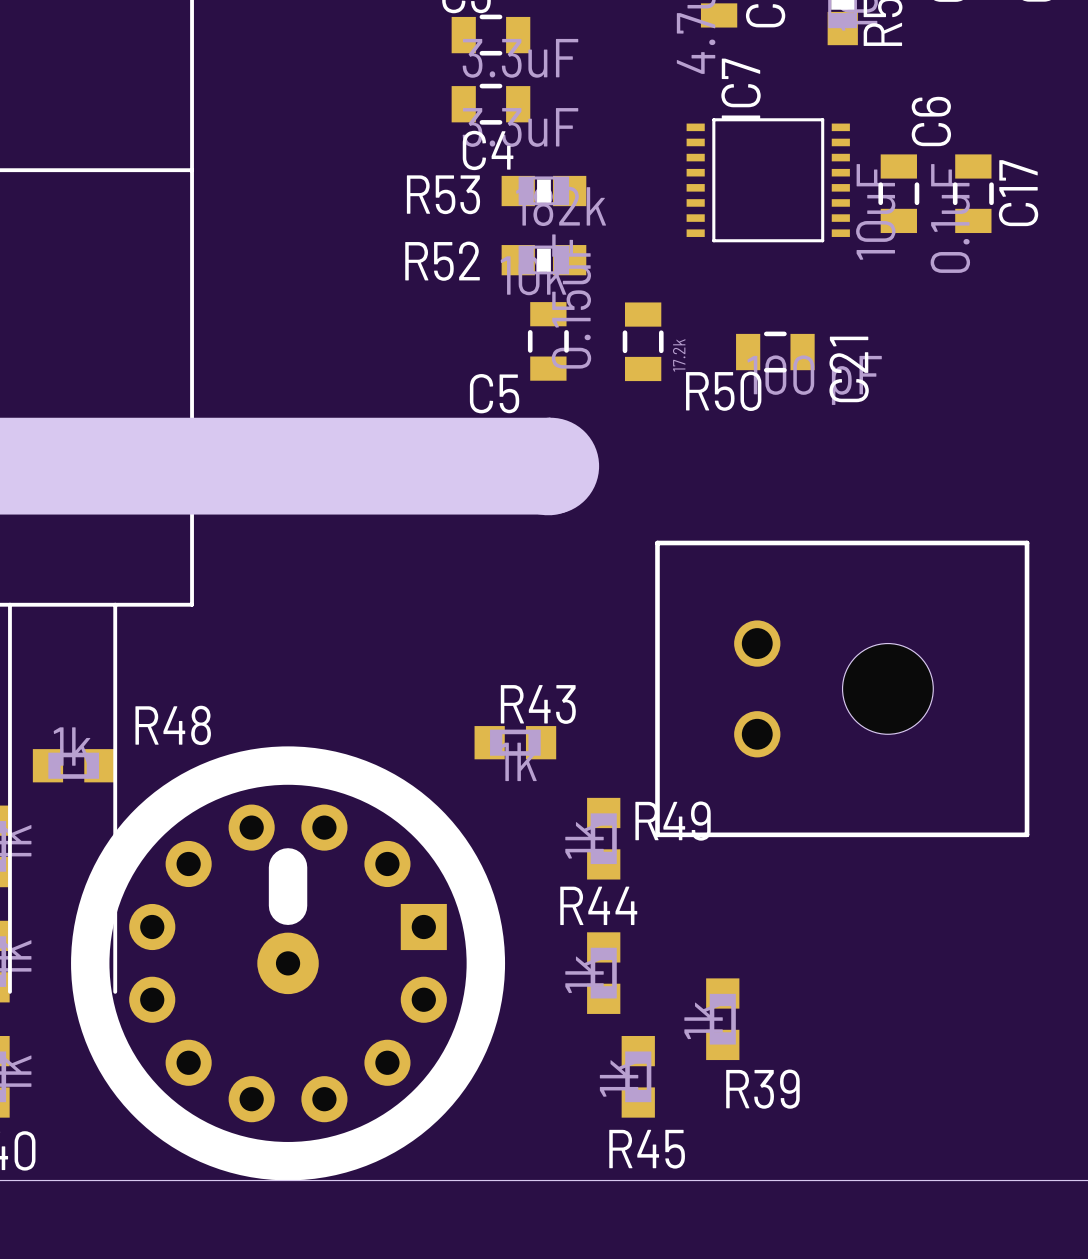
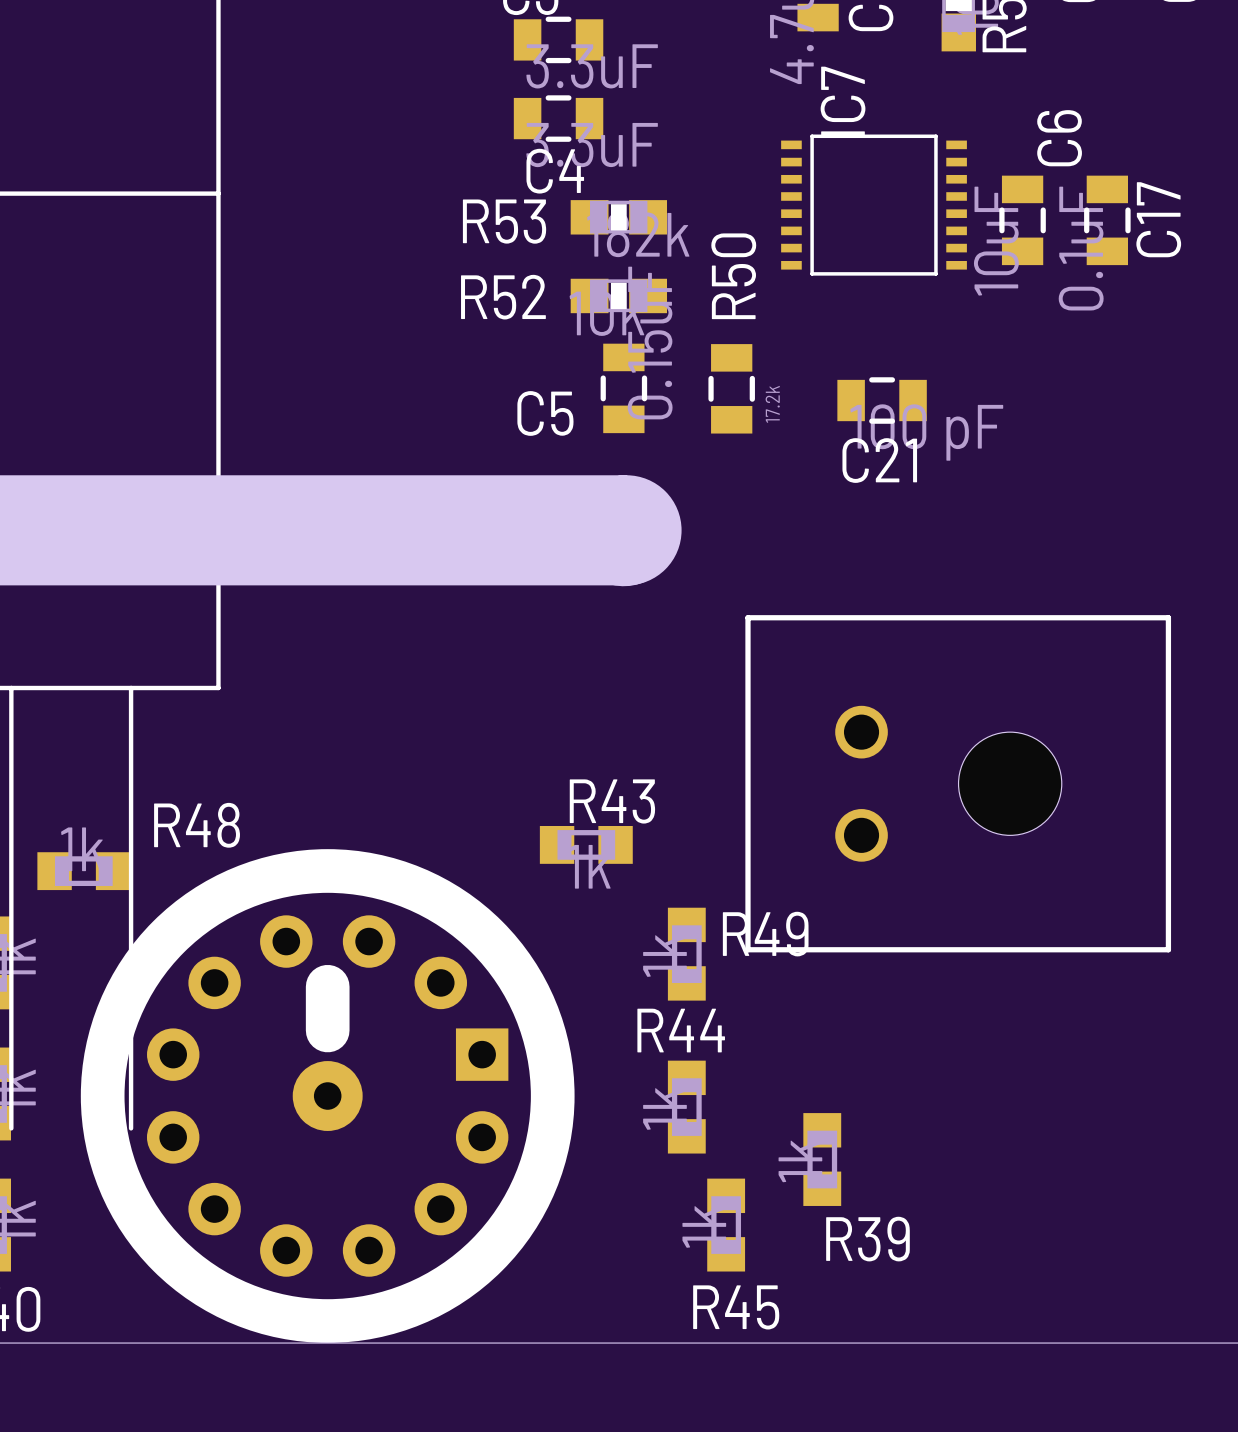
C21 name rotation: 0° (849, 369) -> 90° clockwise (879, 460)
R50 name rotation: 0° (723, 391) -> 90° counterclockwise (733, 276)
R50 name position: R50 (723, 391) -> R50 (733, 276)
C5 name position: C5 (494, 393) -> C5 (545, 413)

